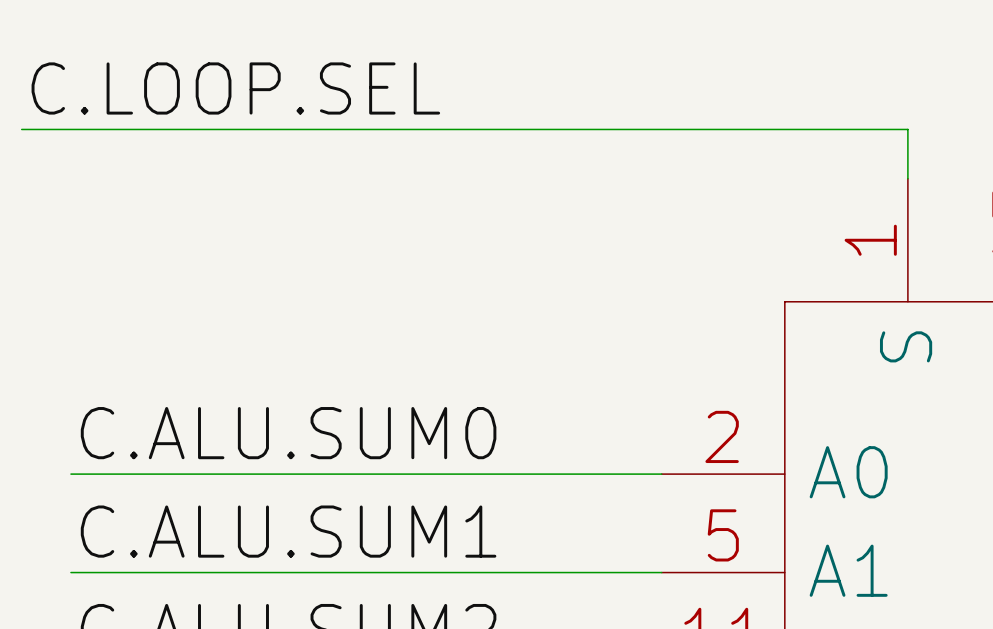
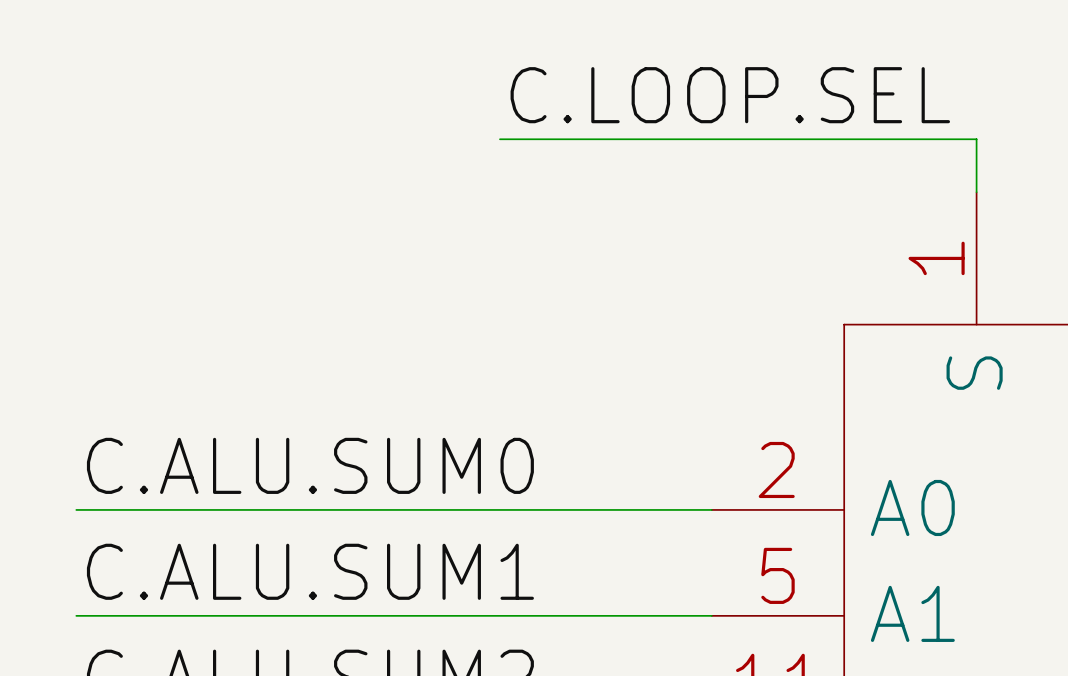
label position: C.LOOP.SEL (235, 88) -> C.LOOP.SEL (730, 95)
wire: (21, 129) (464, 129) -> none

